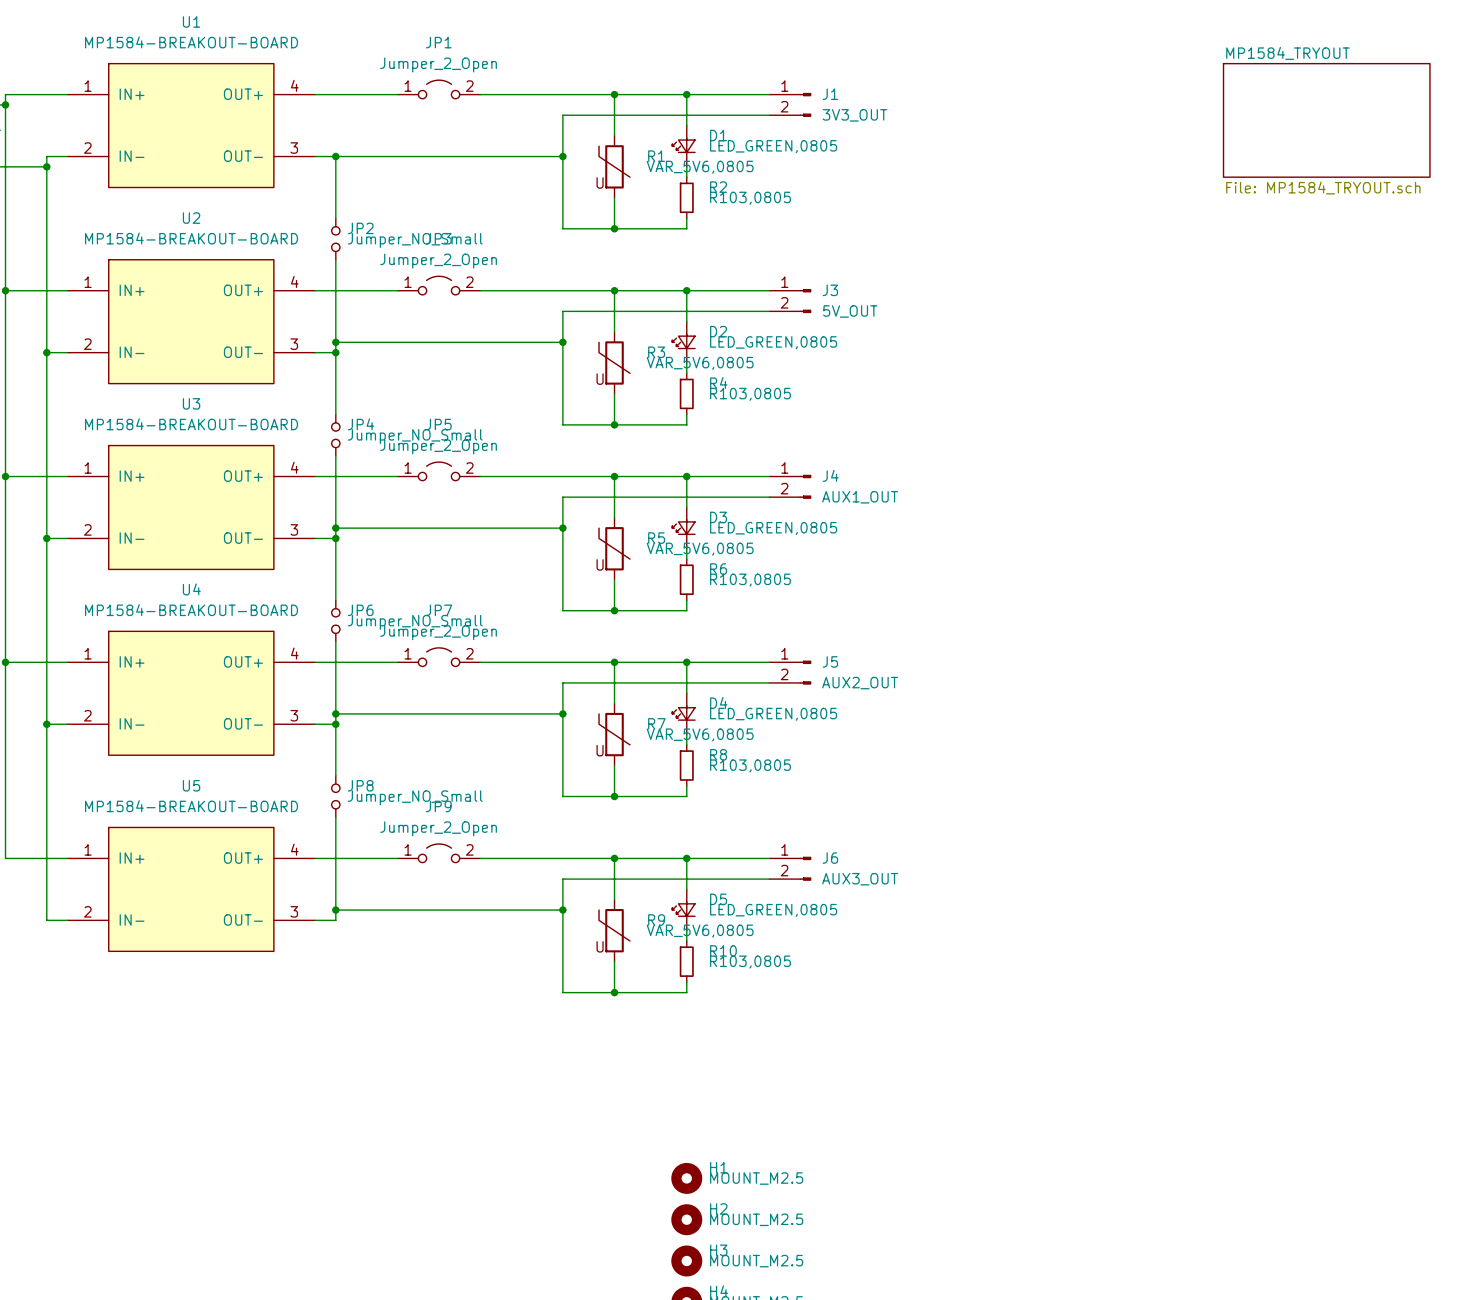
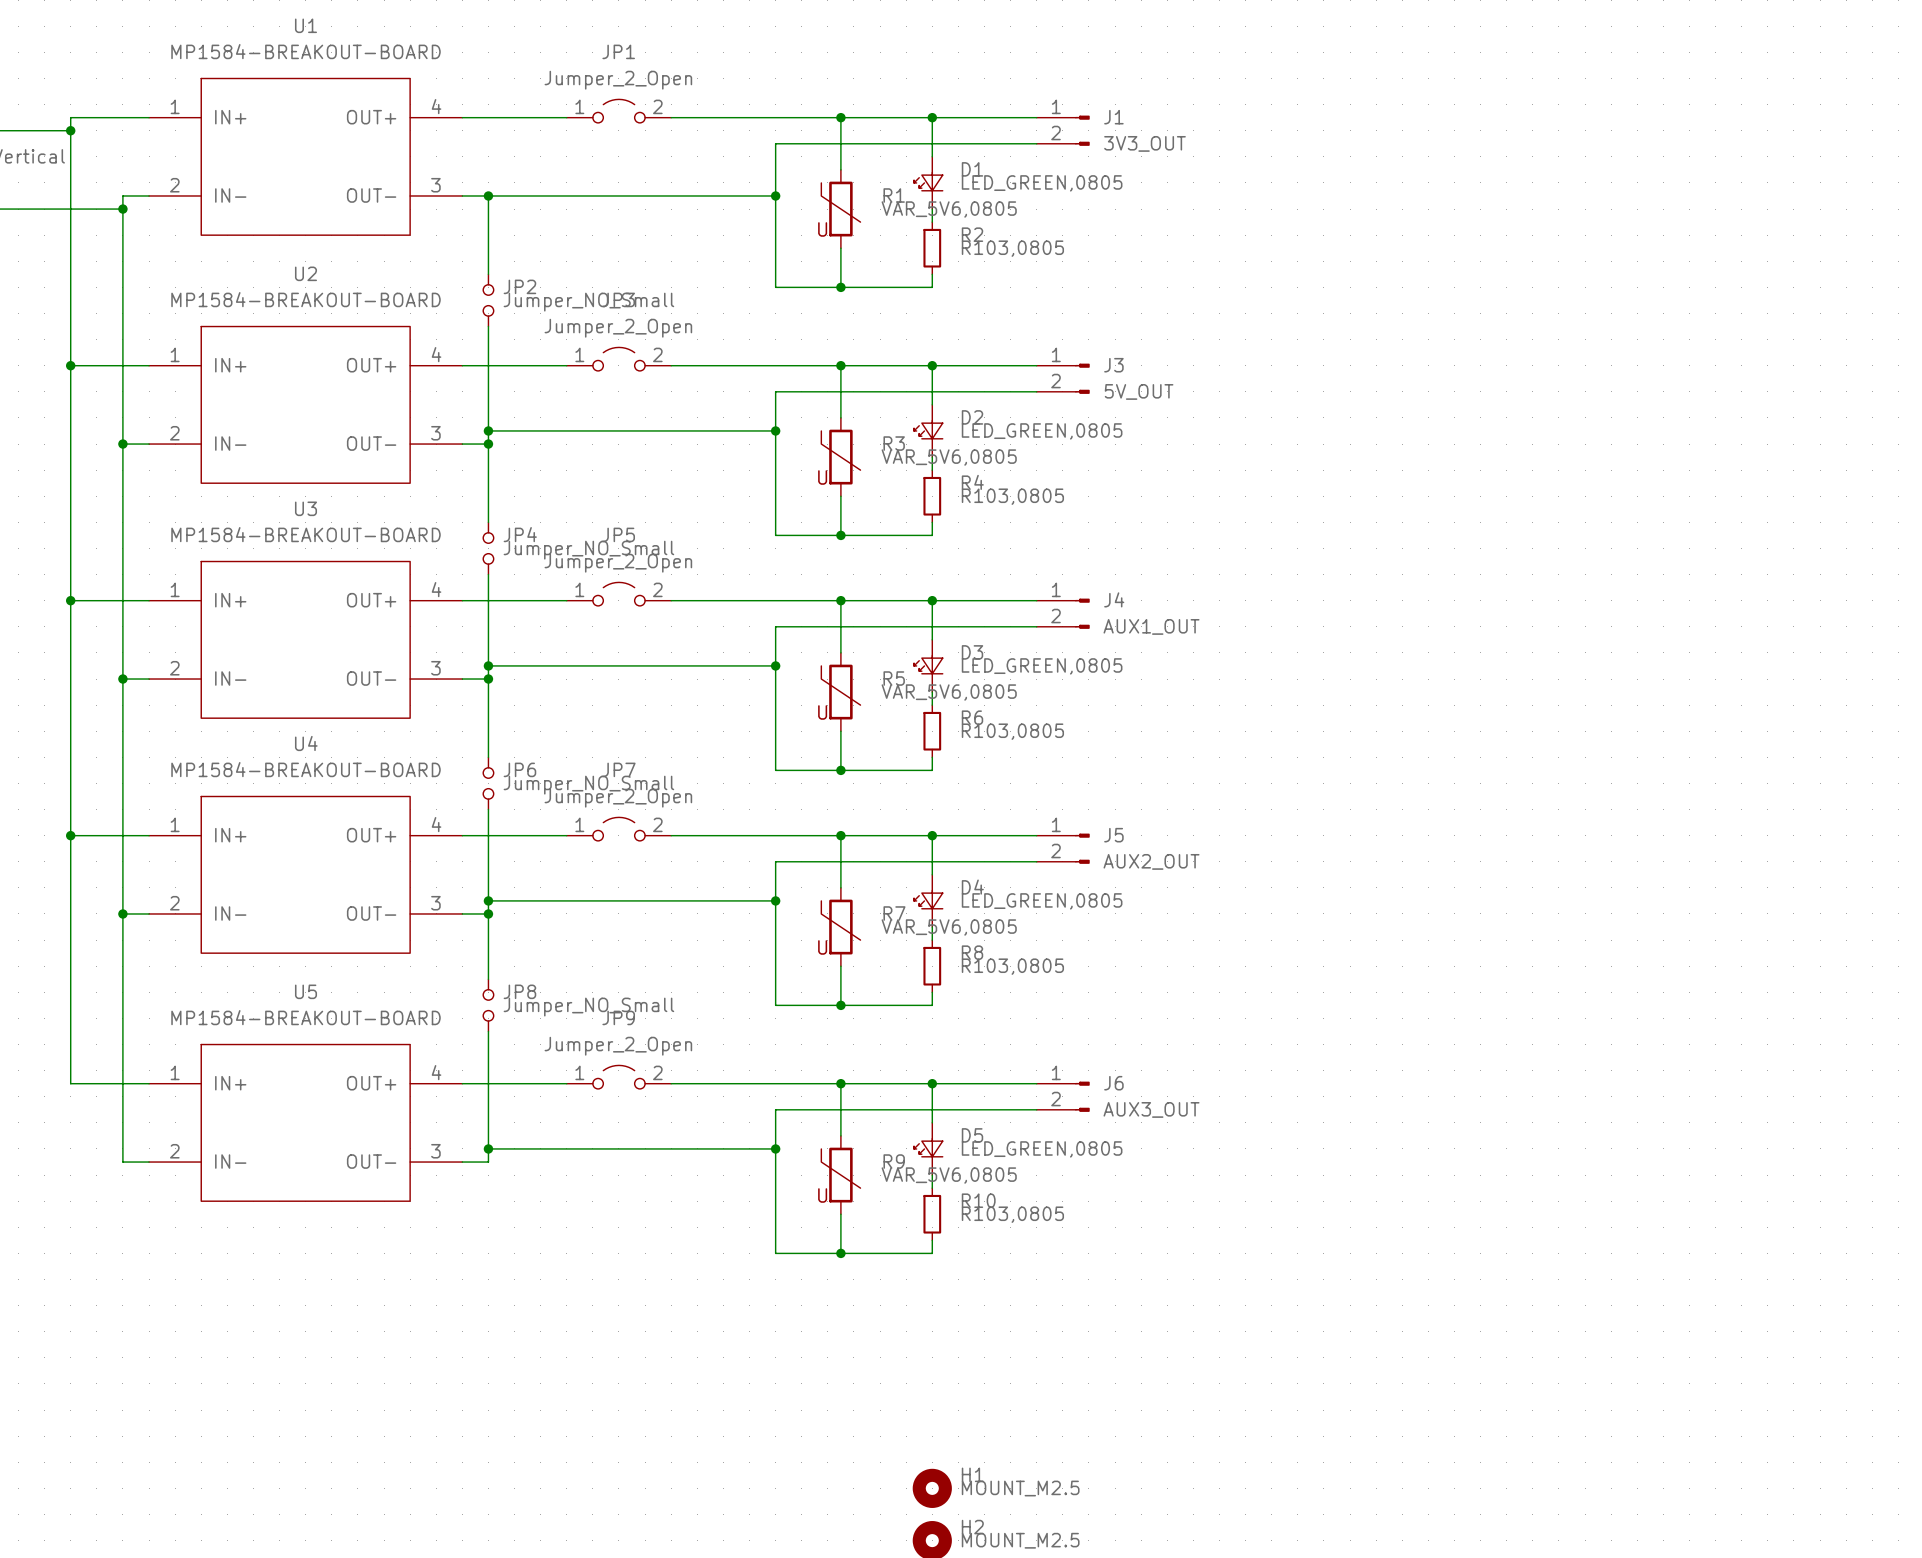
sheet MP1584_TRYOUT: File: MP1584_TRYOUT.sch (1326, 120) -> none

